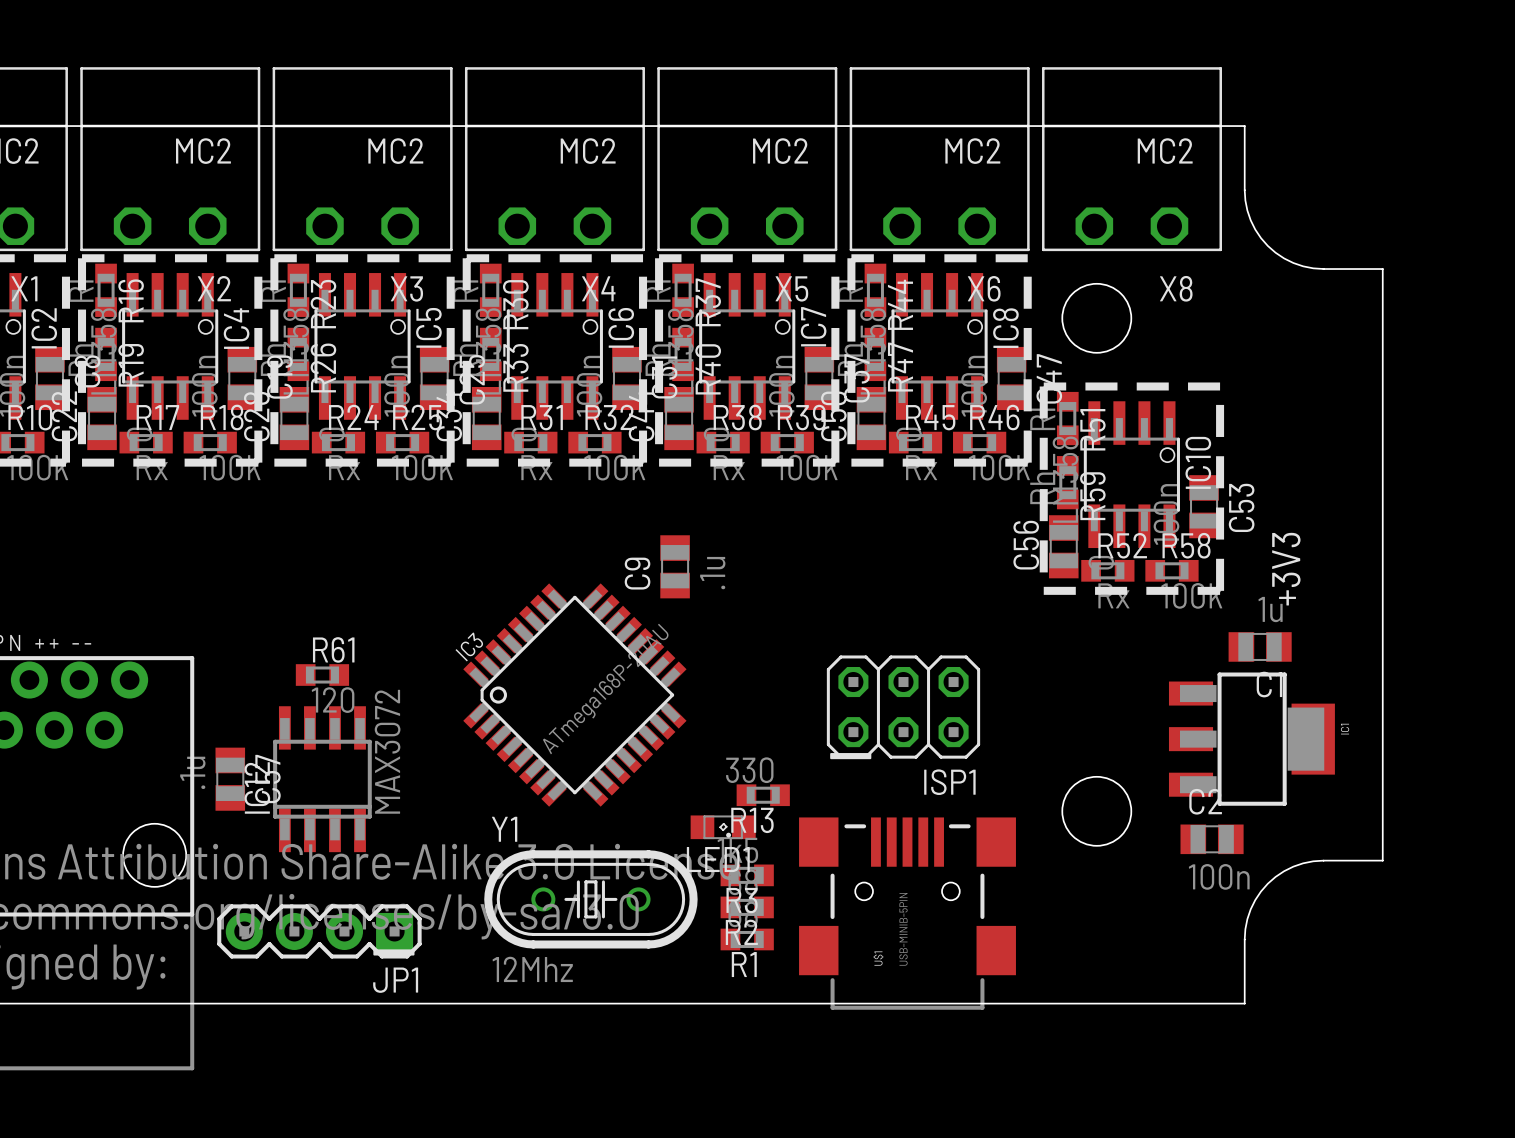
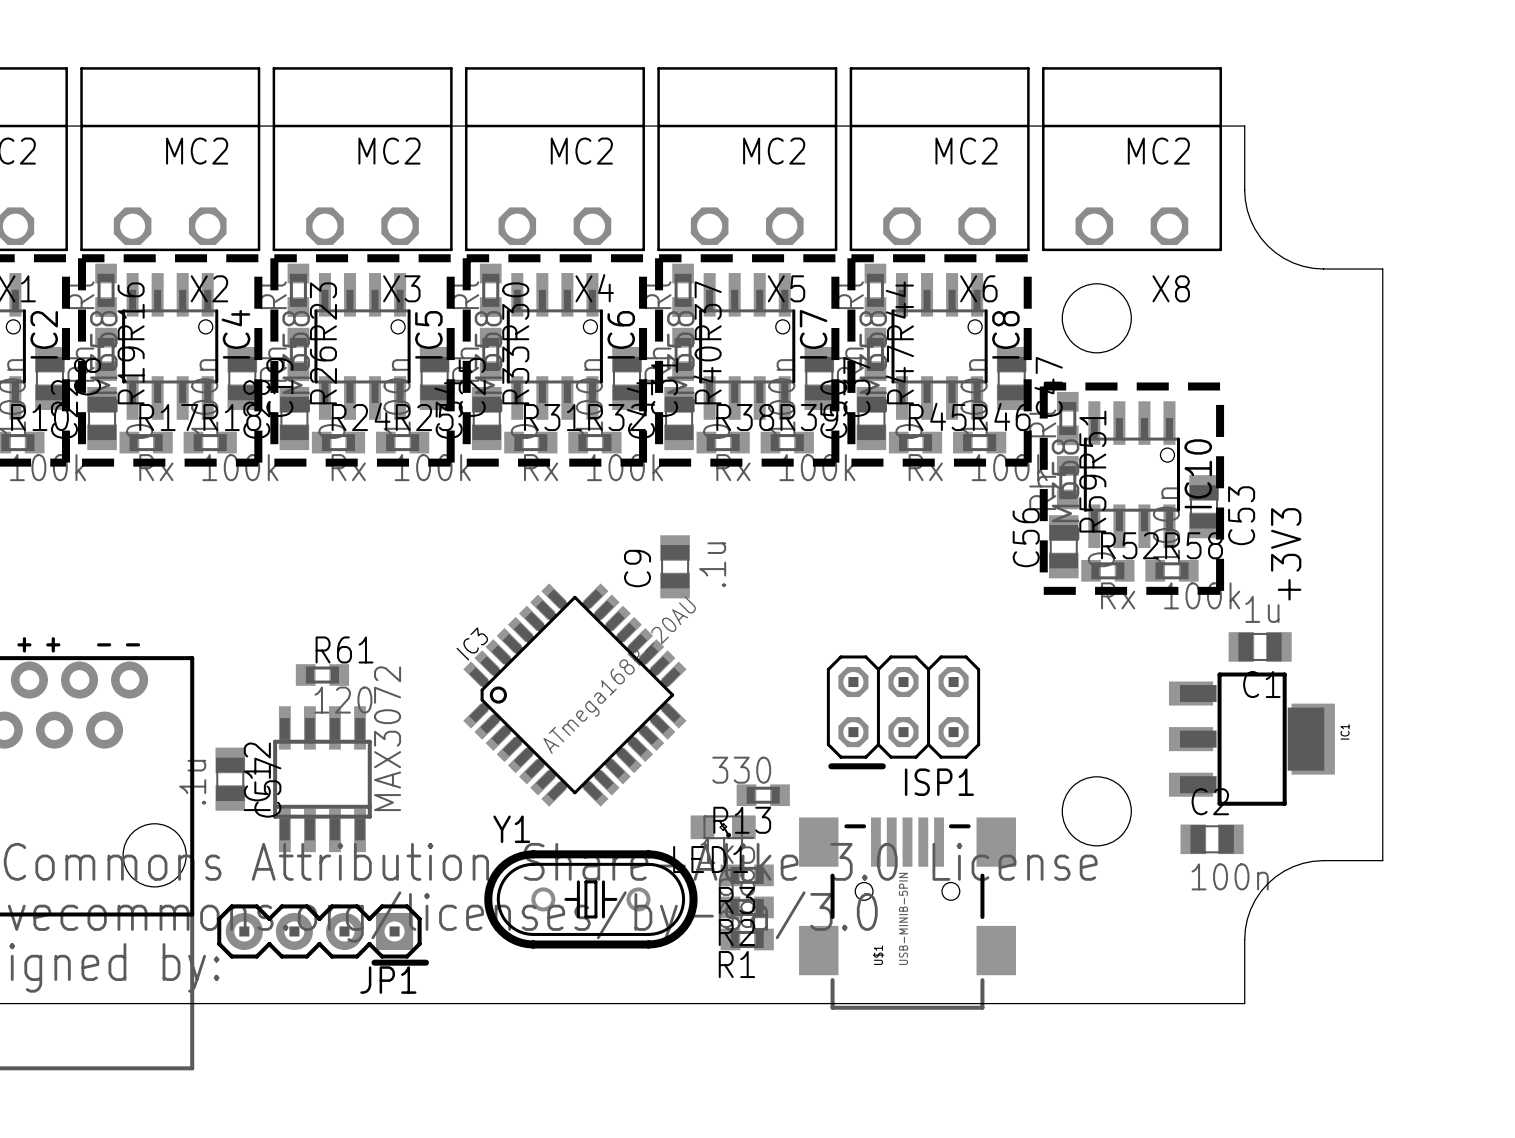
Y1 value: 12Mhz (532, 969) -> none

